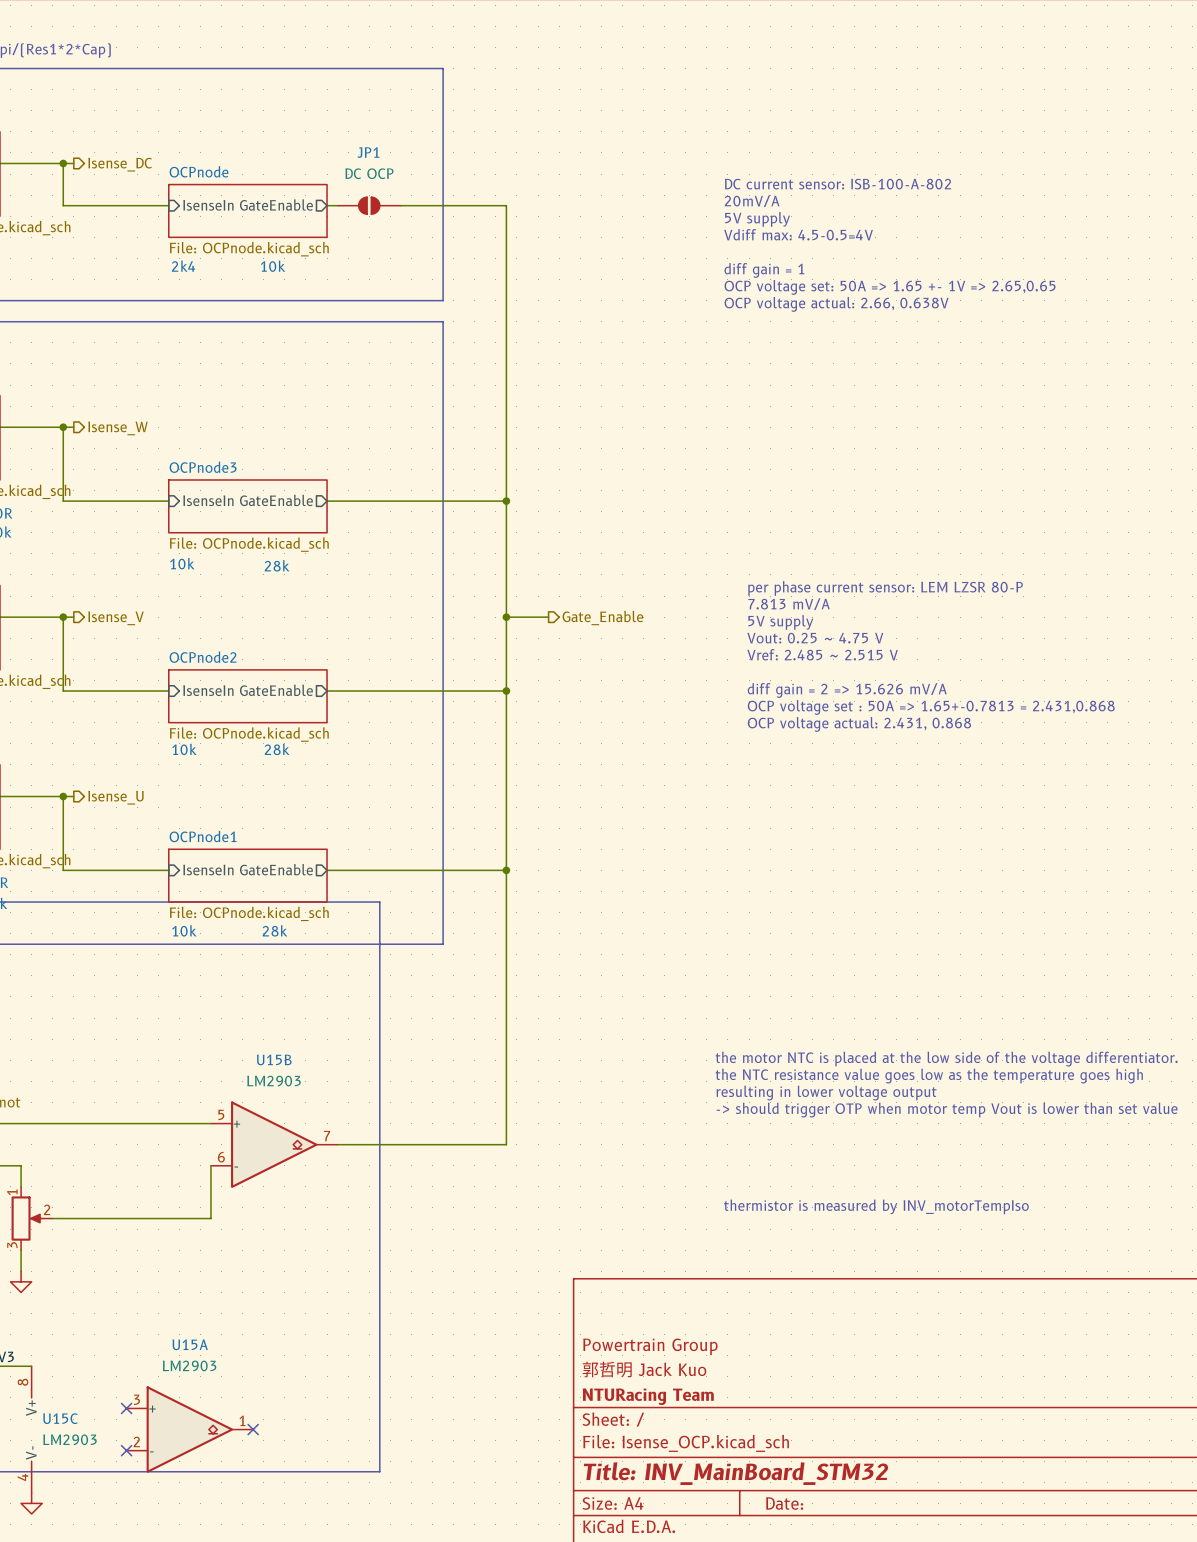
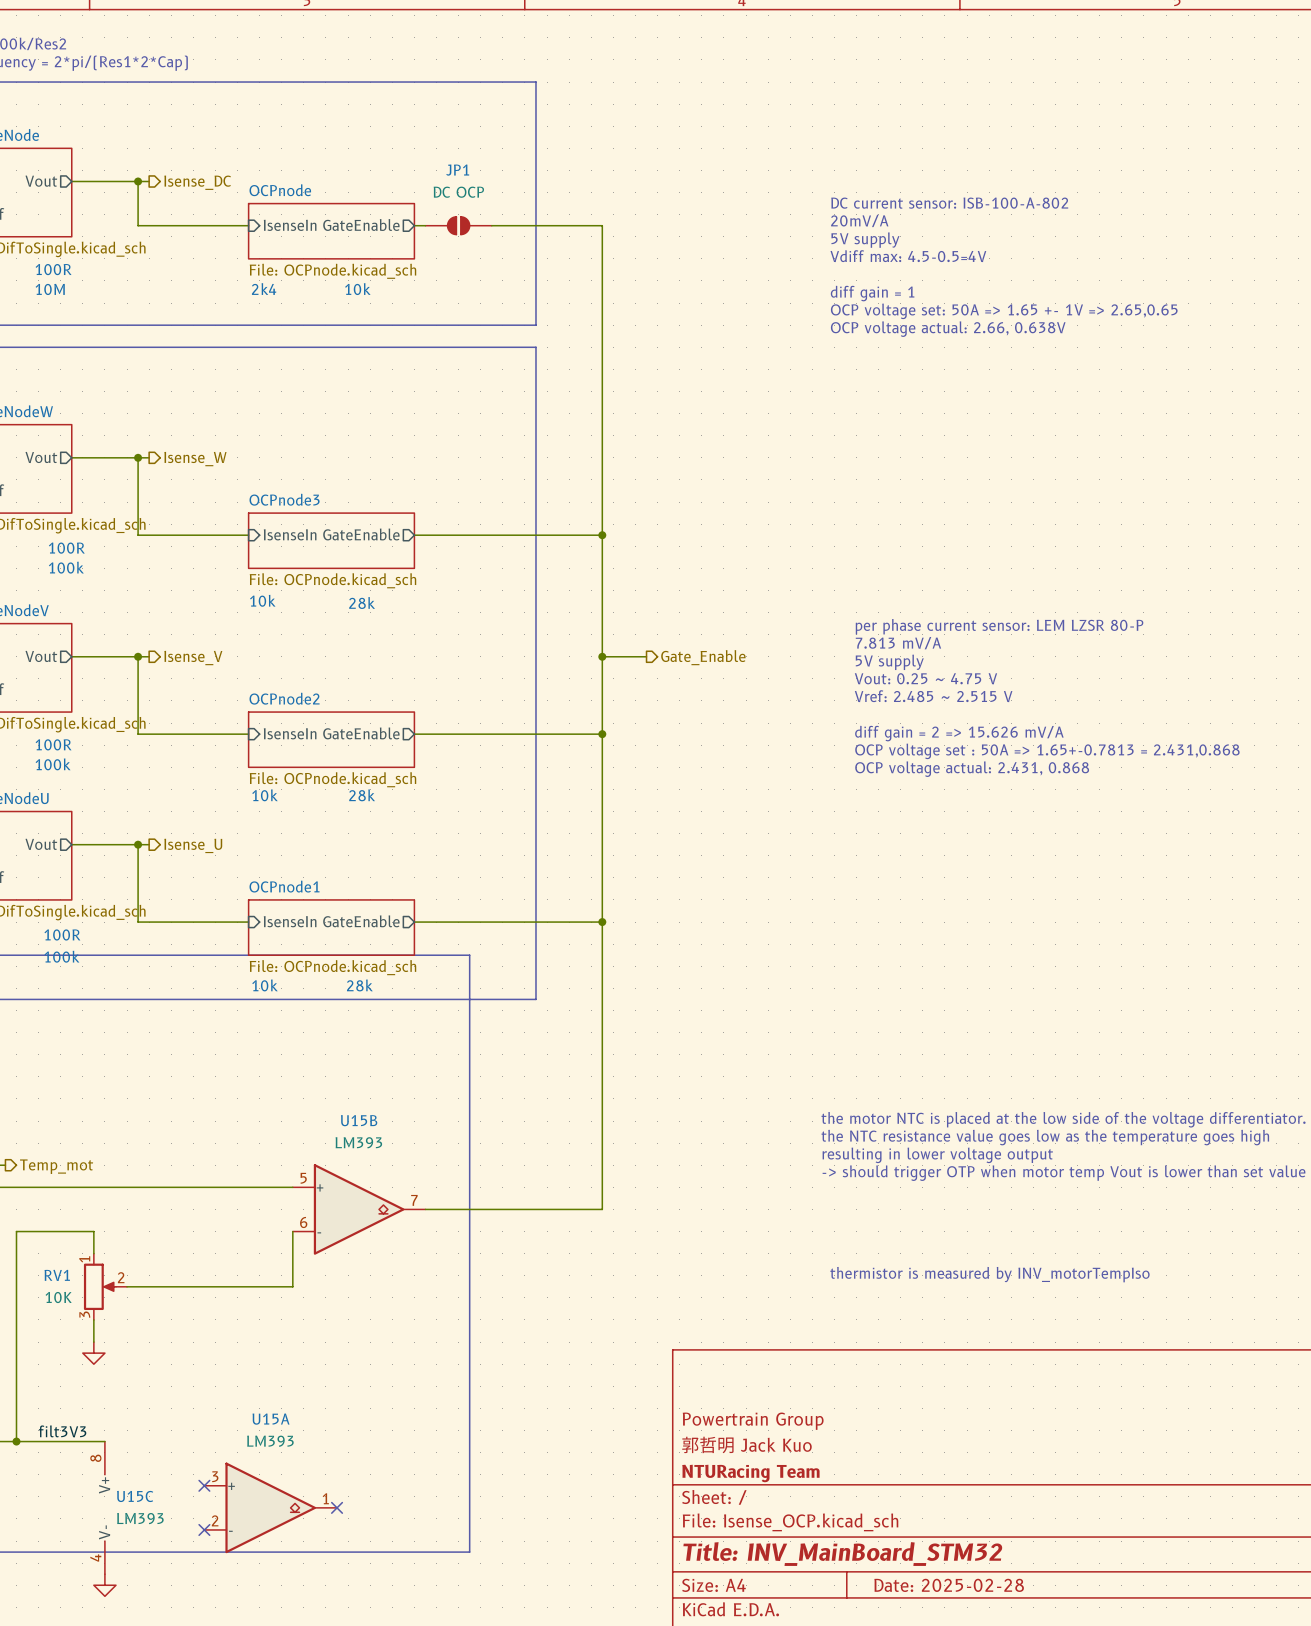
U15B value: LM2903 (273, 1081) -> LM393 (358, 1142)
U15A value: LM2903 (189, 1365) -> LM393 (270, 1441)
U15C value: LM2903 (69, 1439) -> LM393 (140, 1518)
title block: Date: (784, 1503) -> Date: 2025-02-28 (949, 1585)

